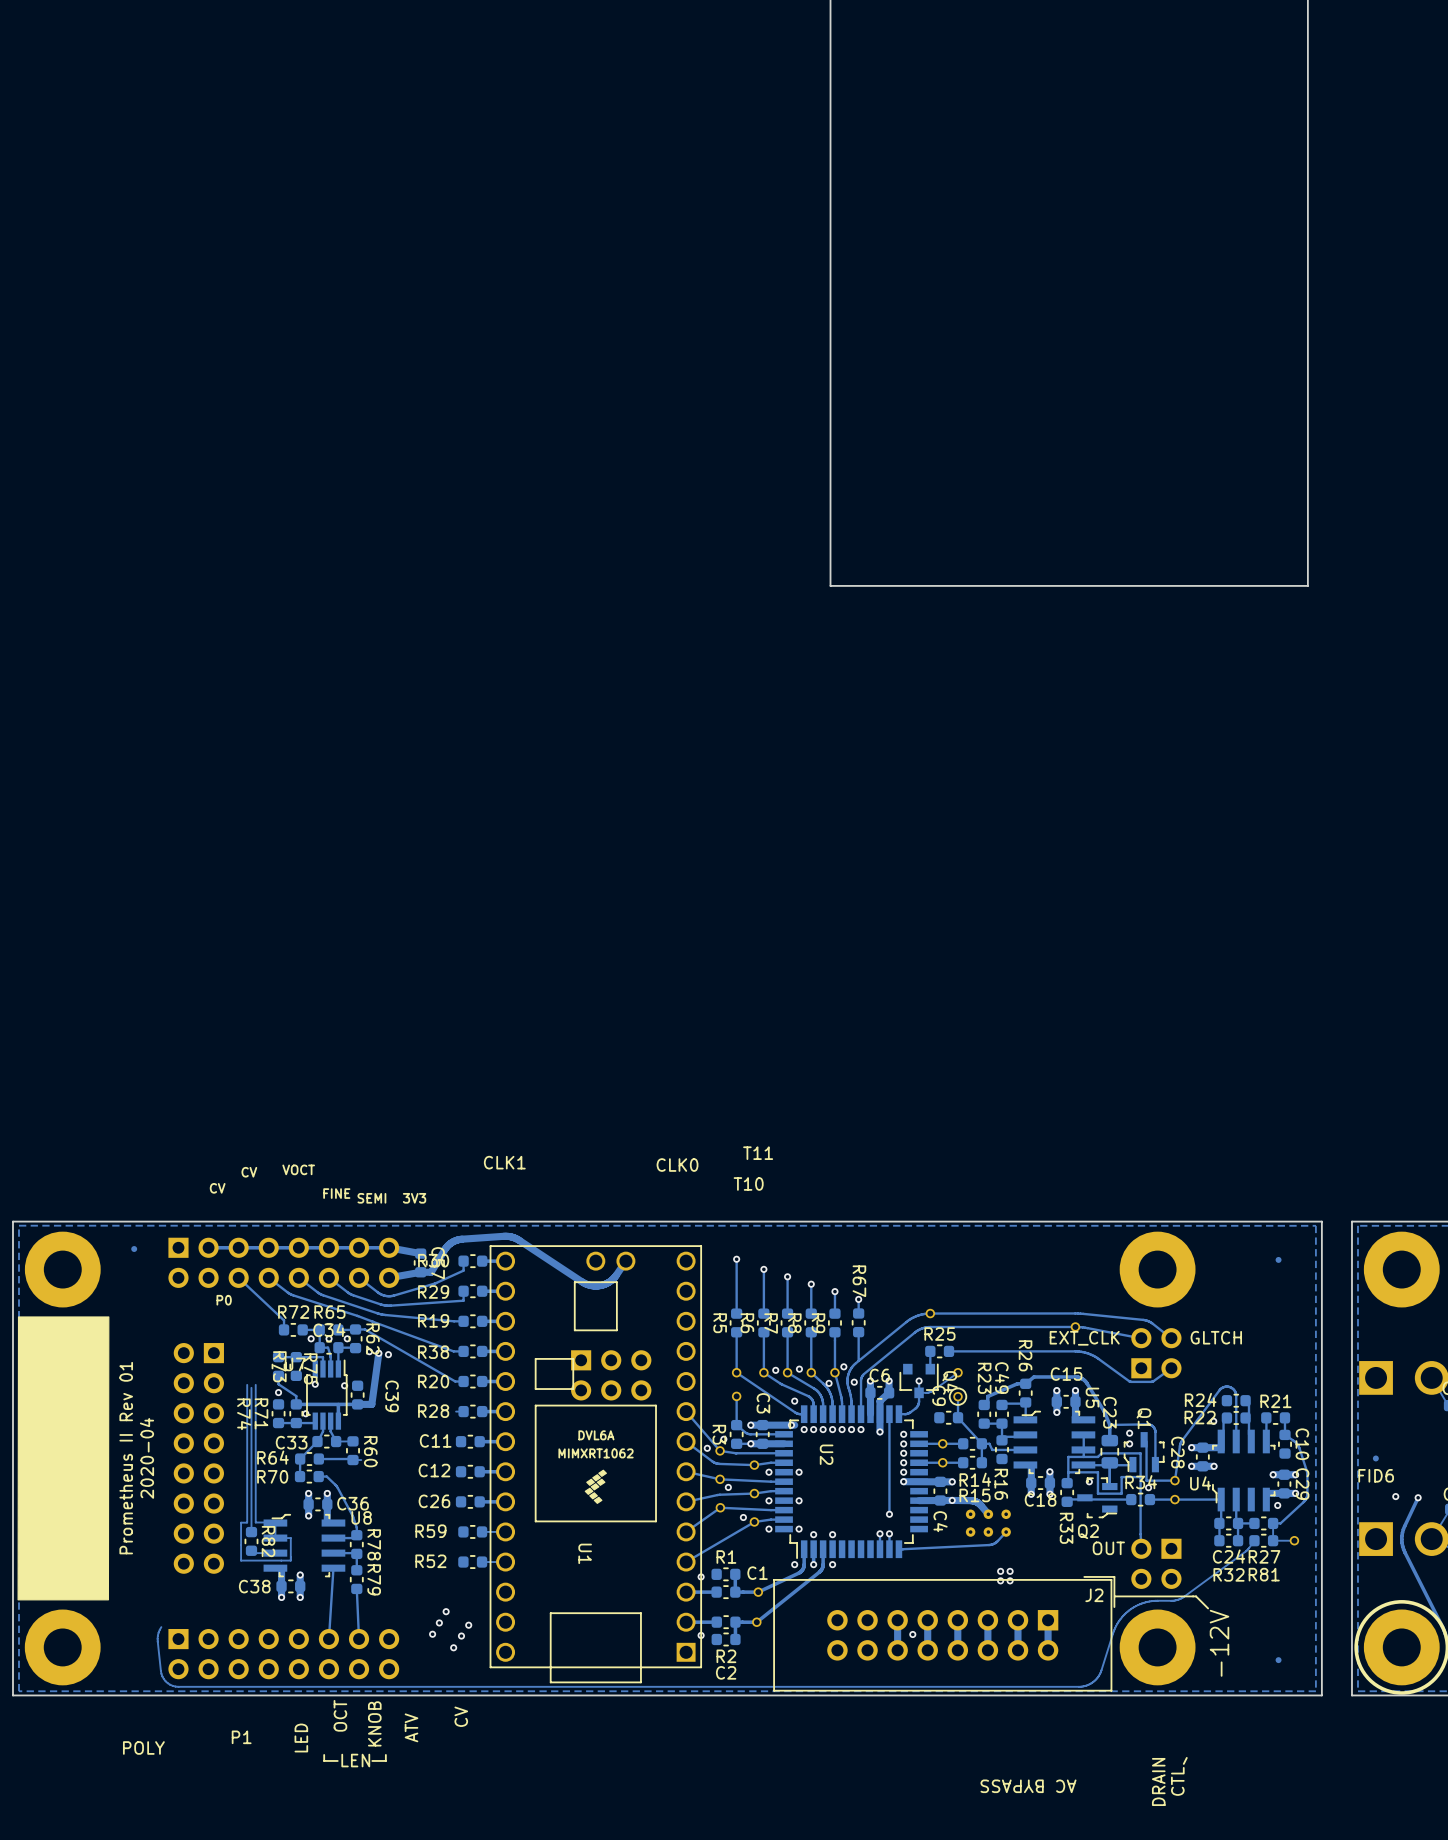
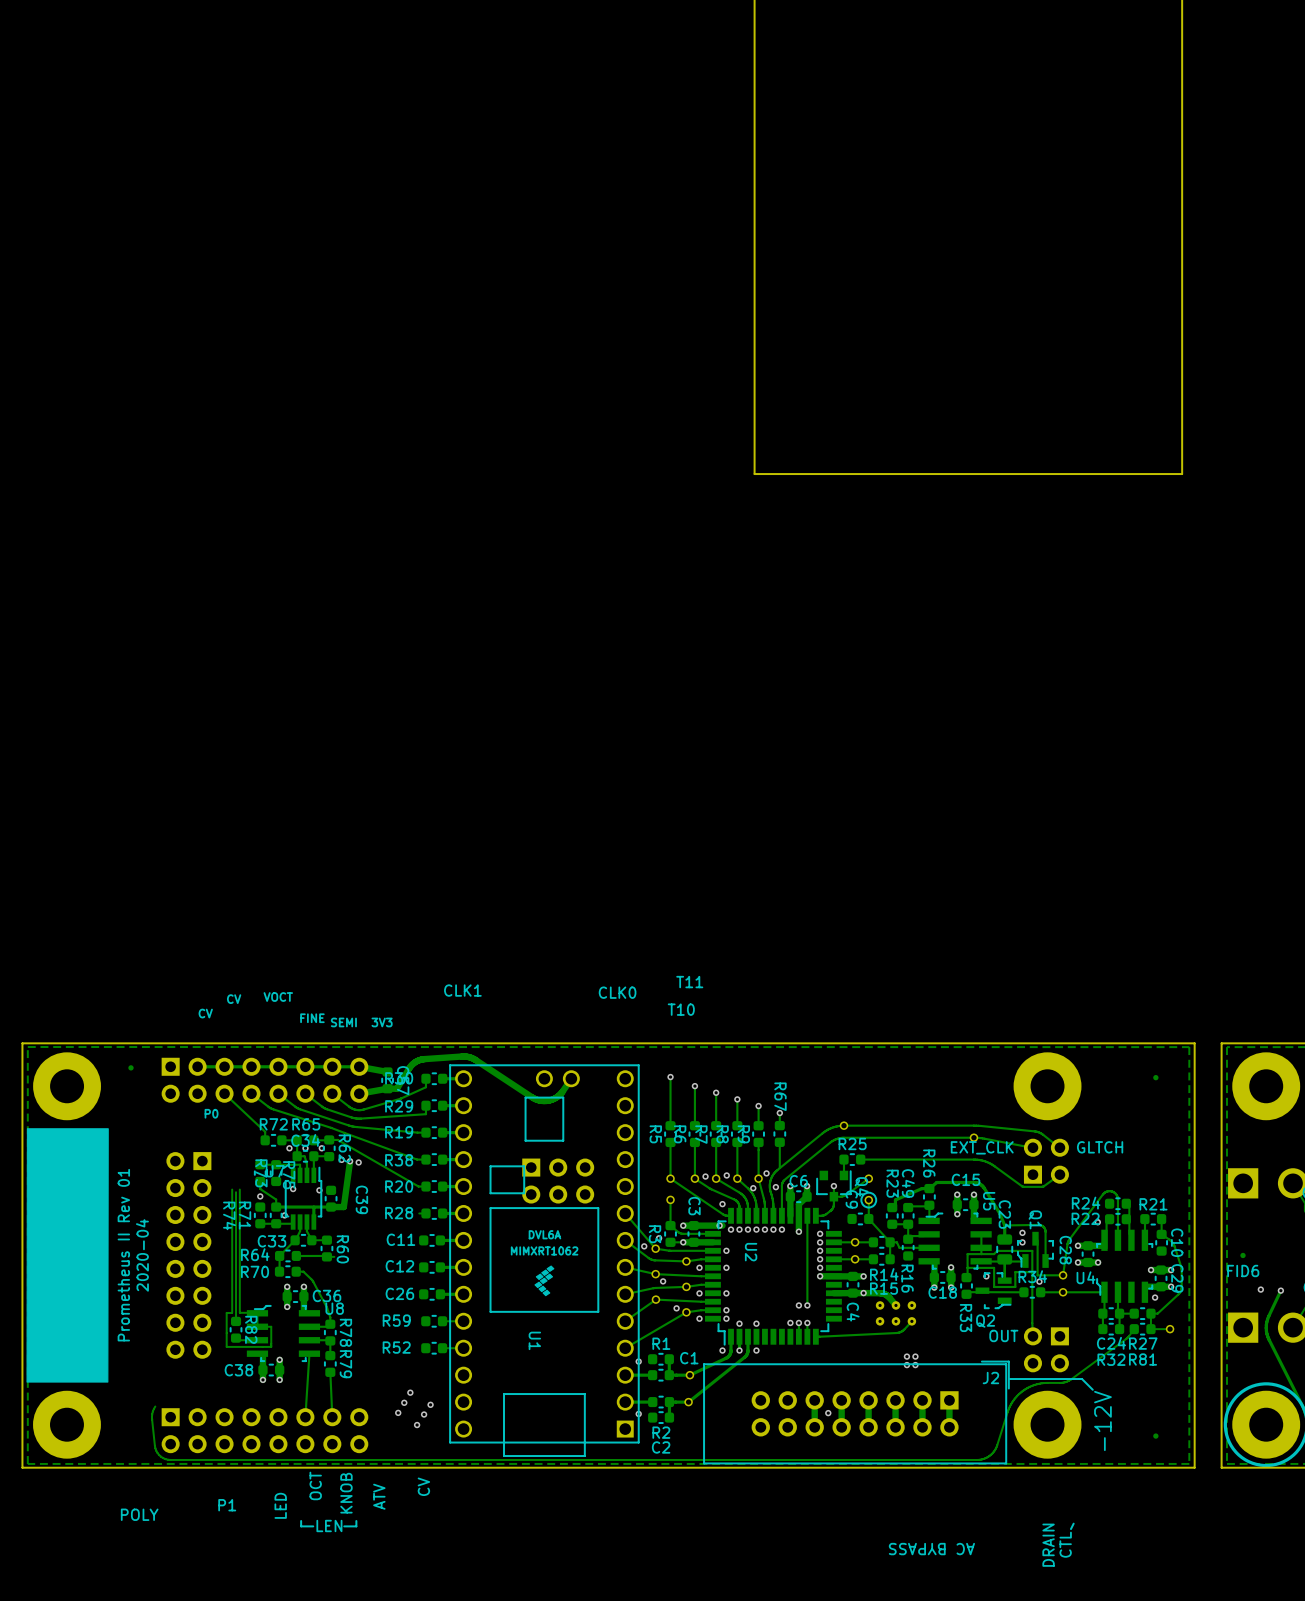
via: none -> (726, 1250)
via: none -> (798, 1305)
via: none -> (726, 1310)
via: none -> (790, 1322)

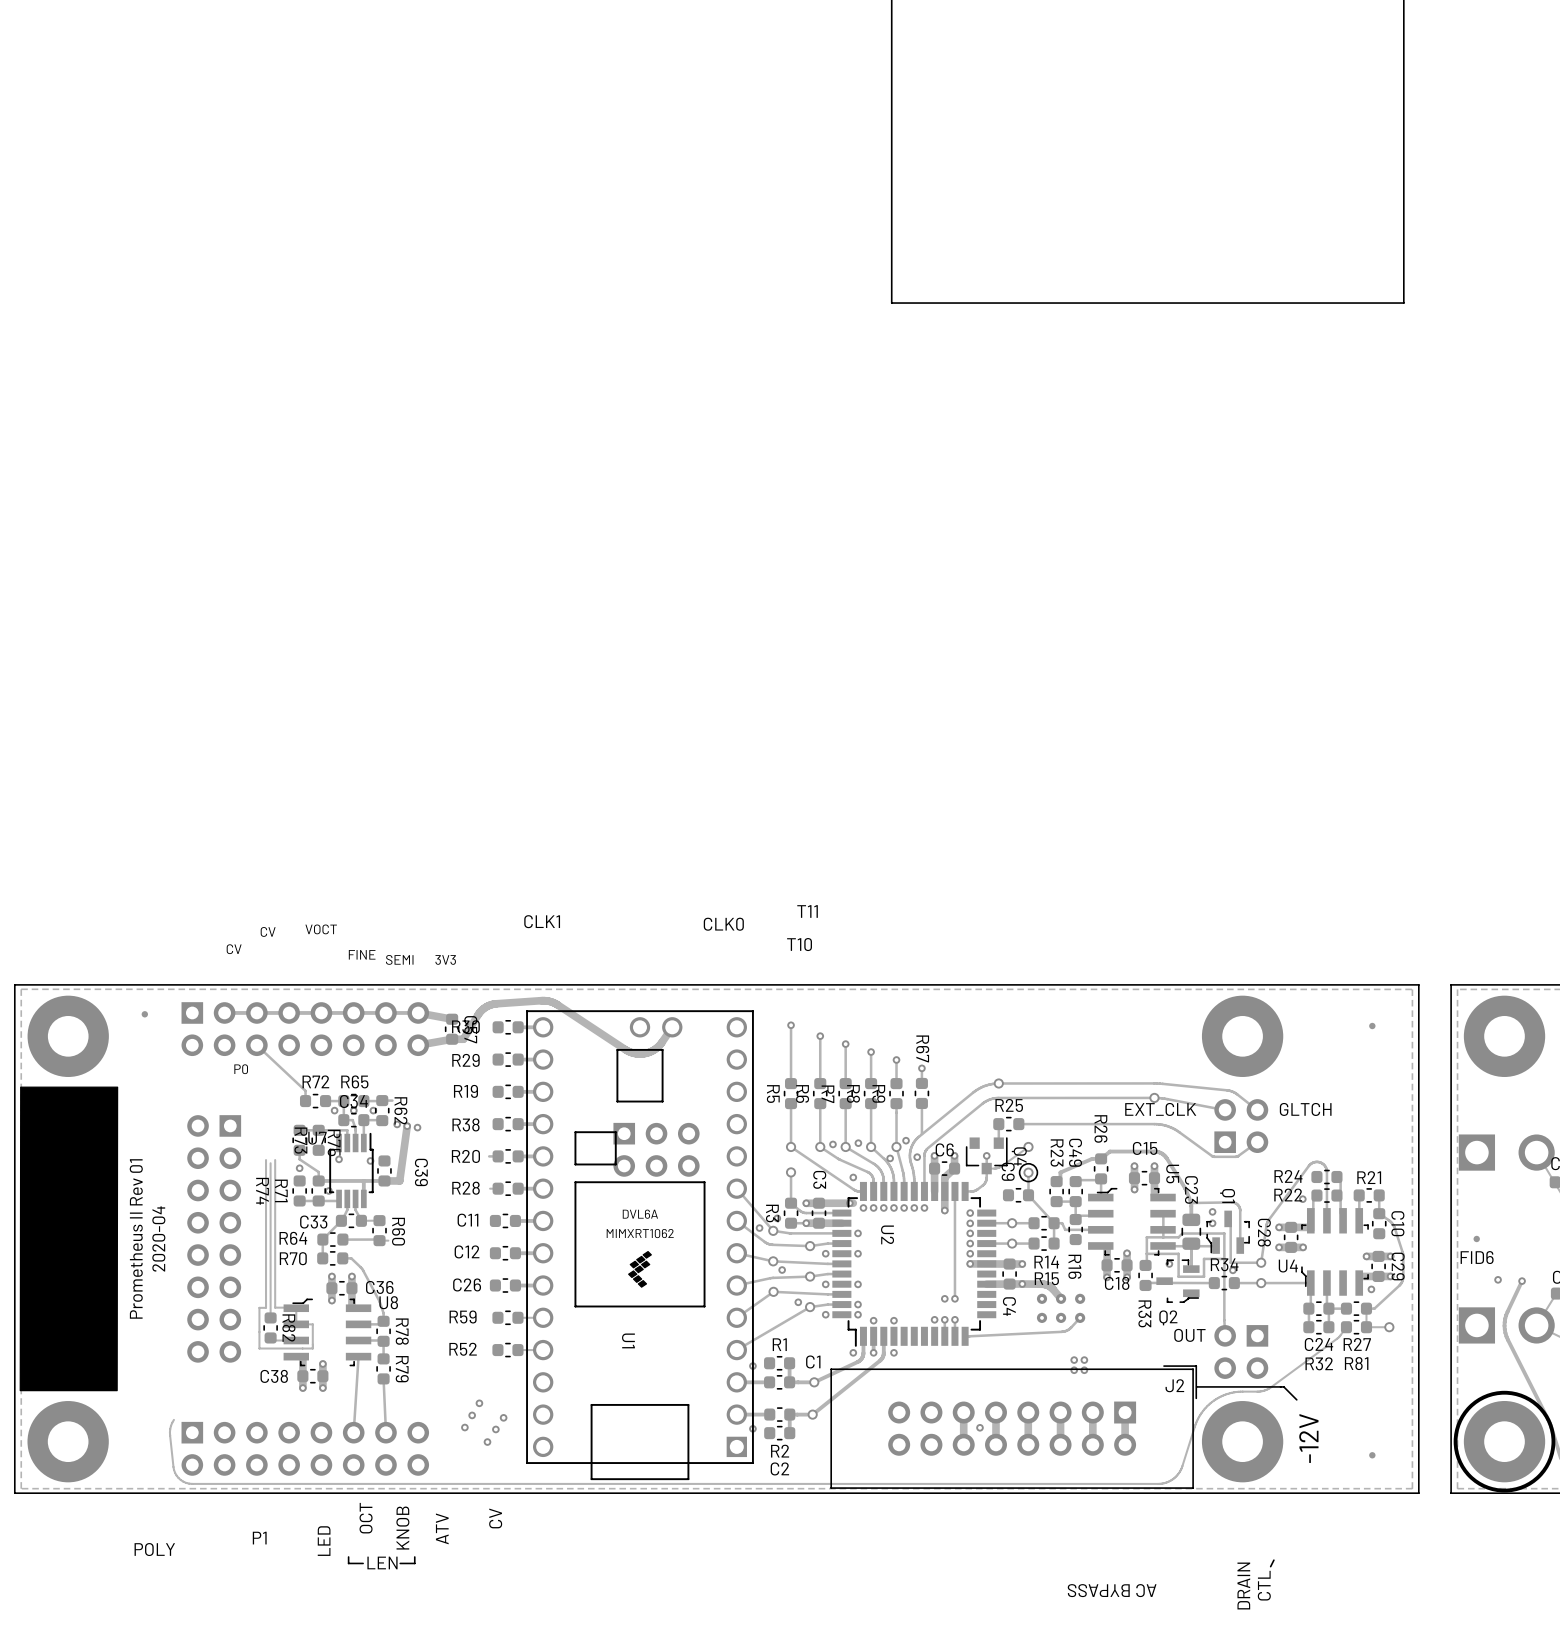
track: (425, 1078) (425, 1087) (400, 1098) (361, 1109) (351, 1107) (332, 1093) -> none
track: (251, 1093) (272, 1109) (330, 1127) (417, 1159) (425, 1159) -> none
track: (278, 1093) (298, 1108) (350, 1125) (425, 1132) -> none
track: (305, 1093) (325, 1108) (356, 1118) (425, 1114) (425, 1105) -> none
track: (337, 1139) (418, 1186) -> none

